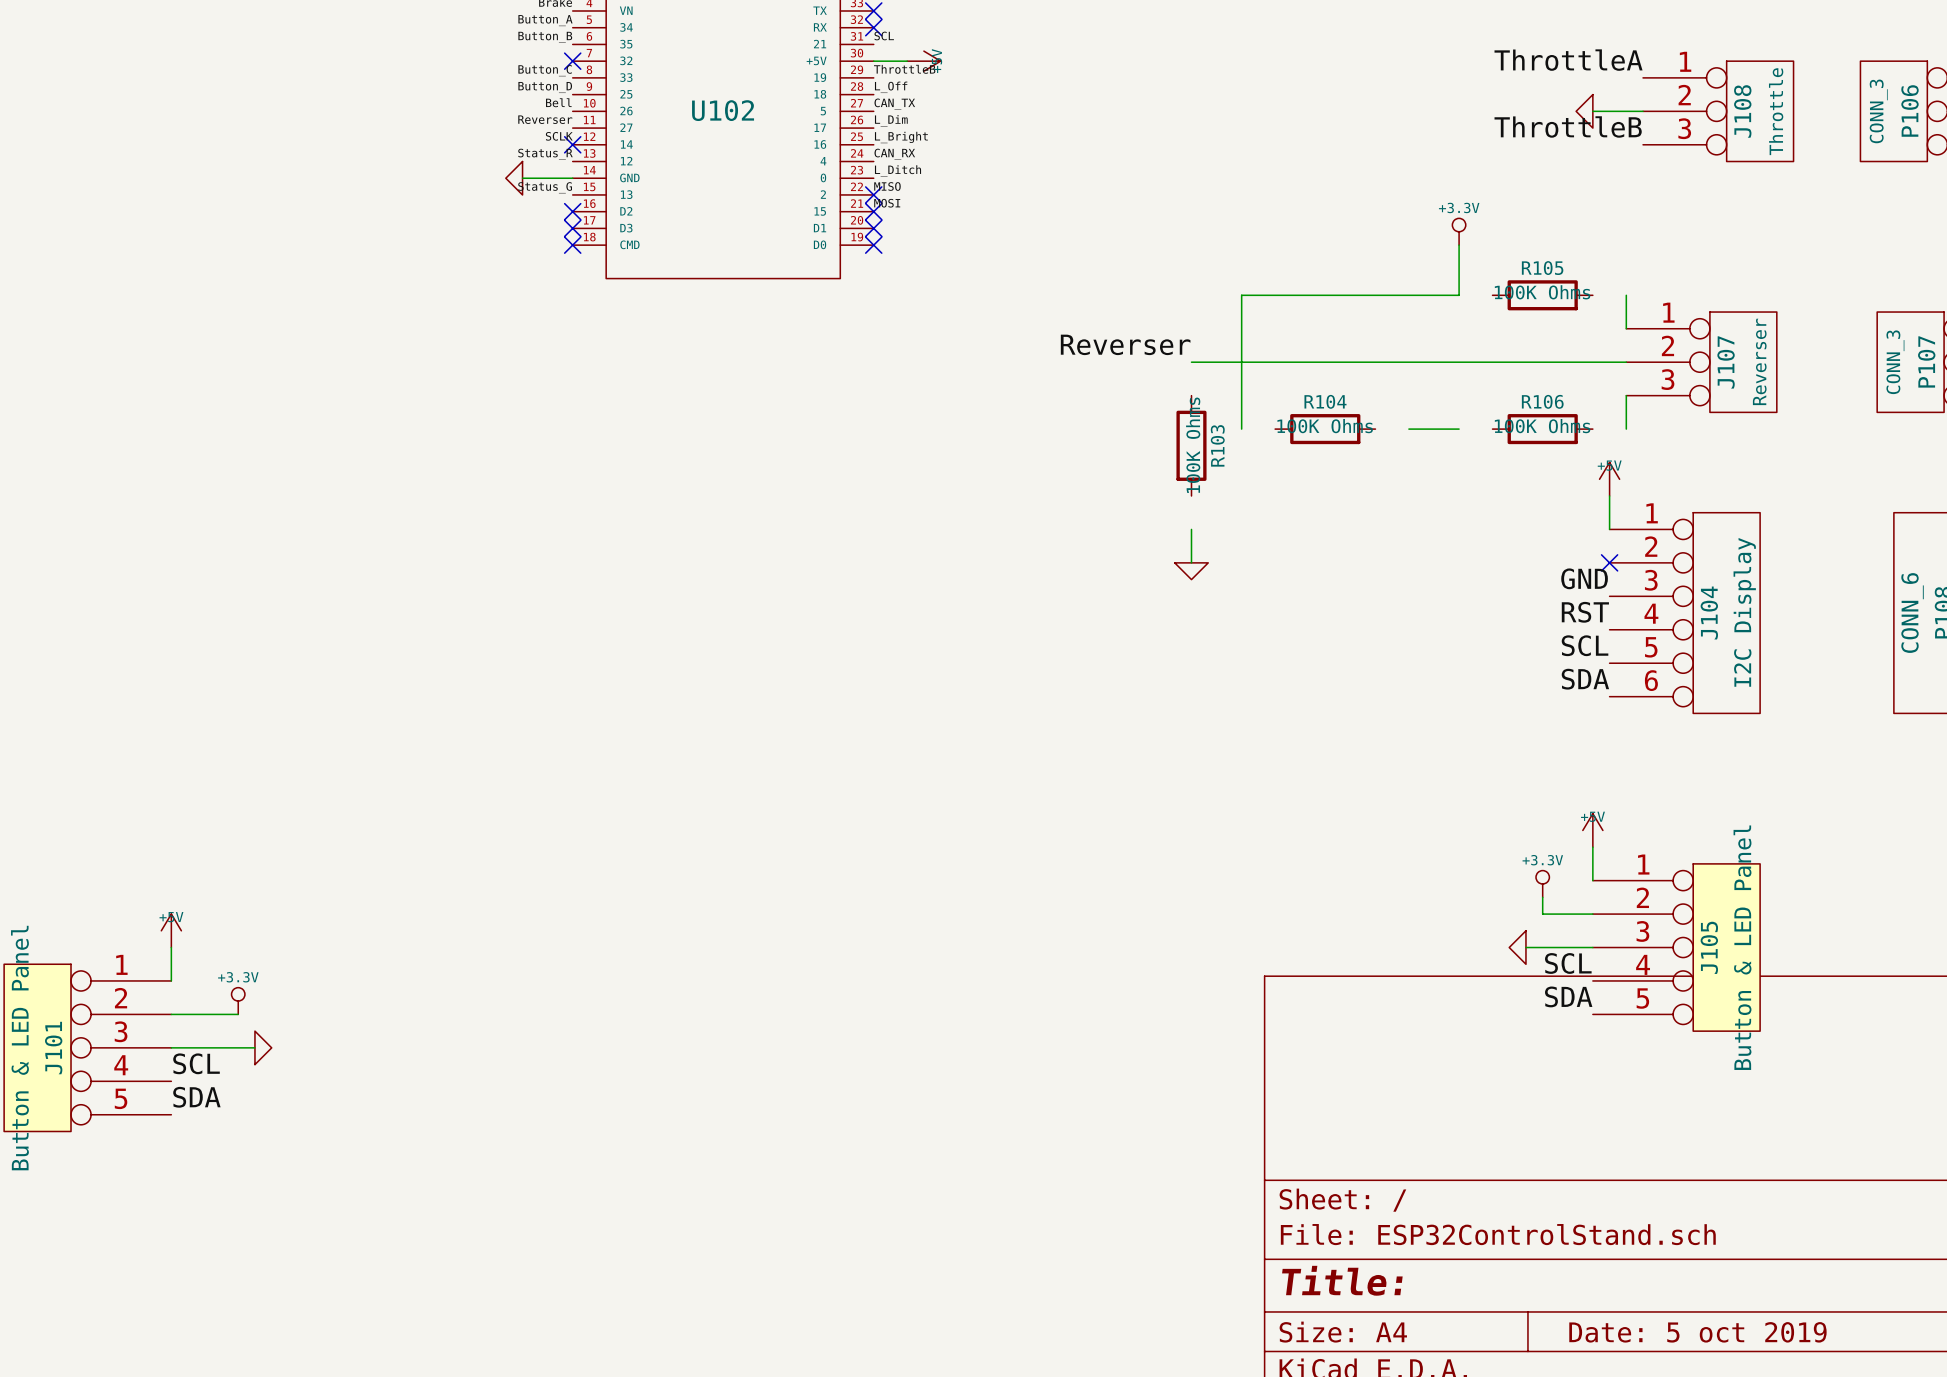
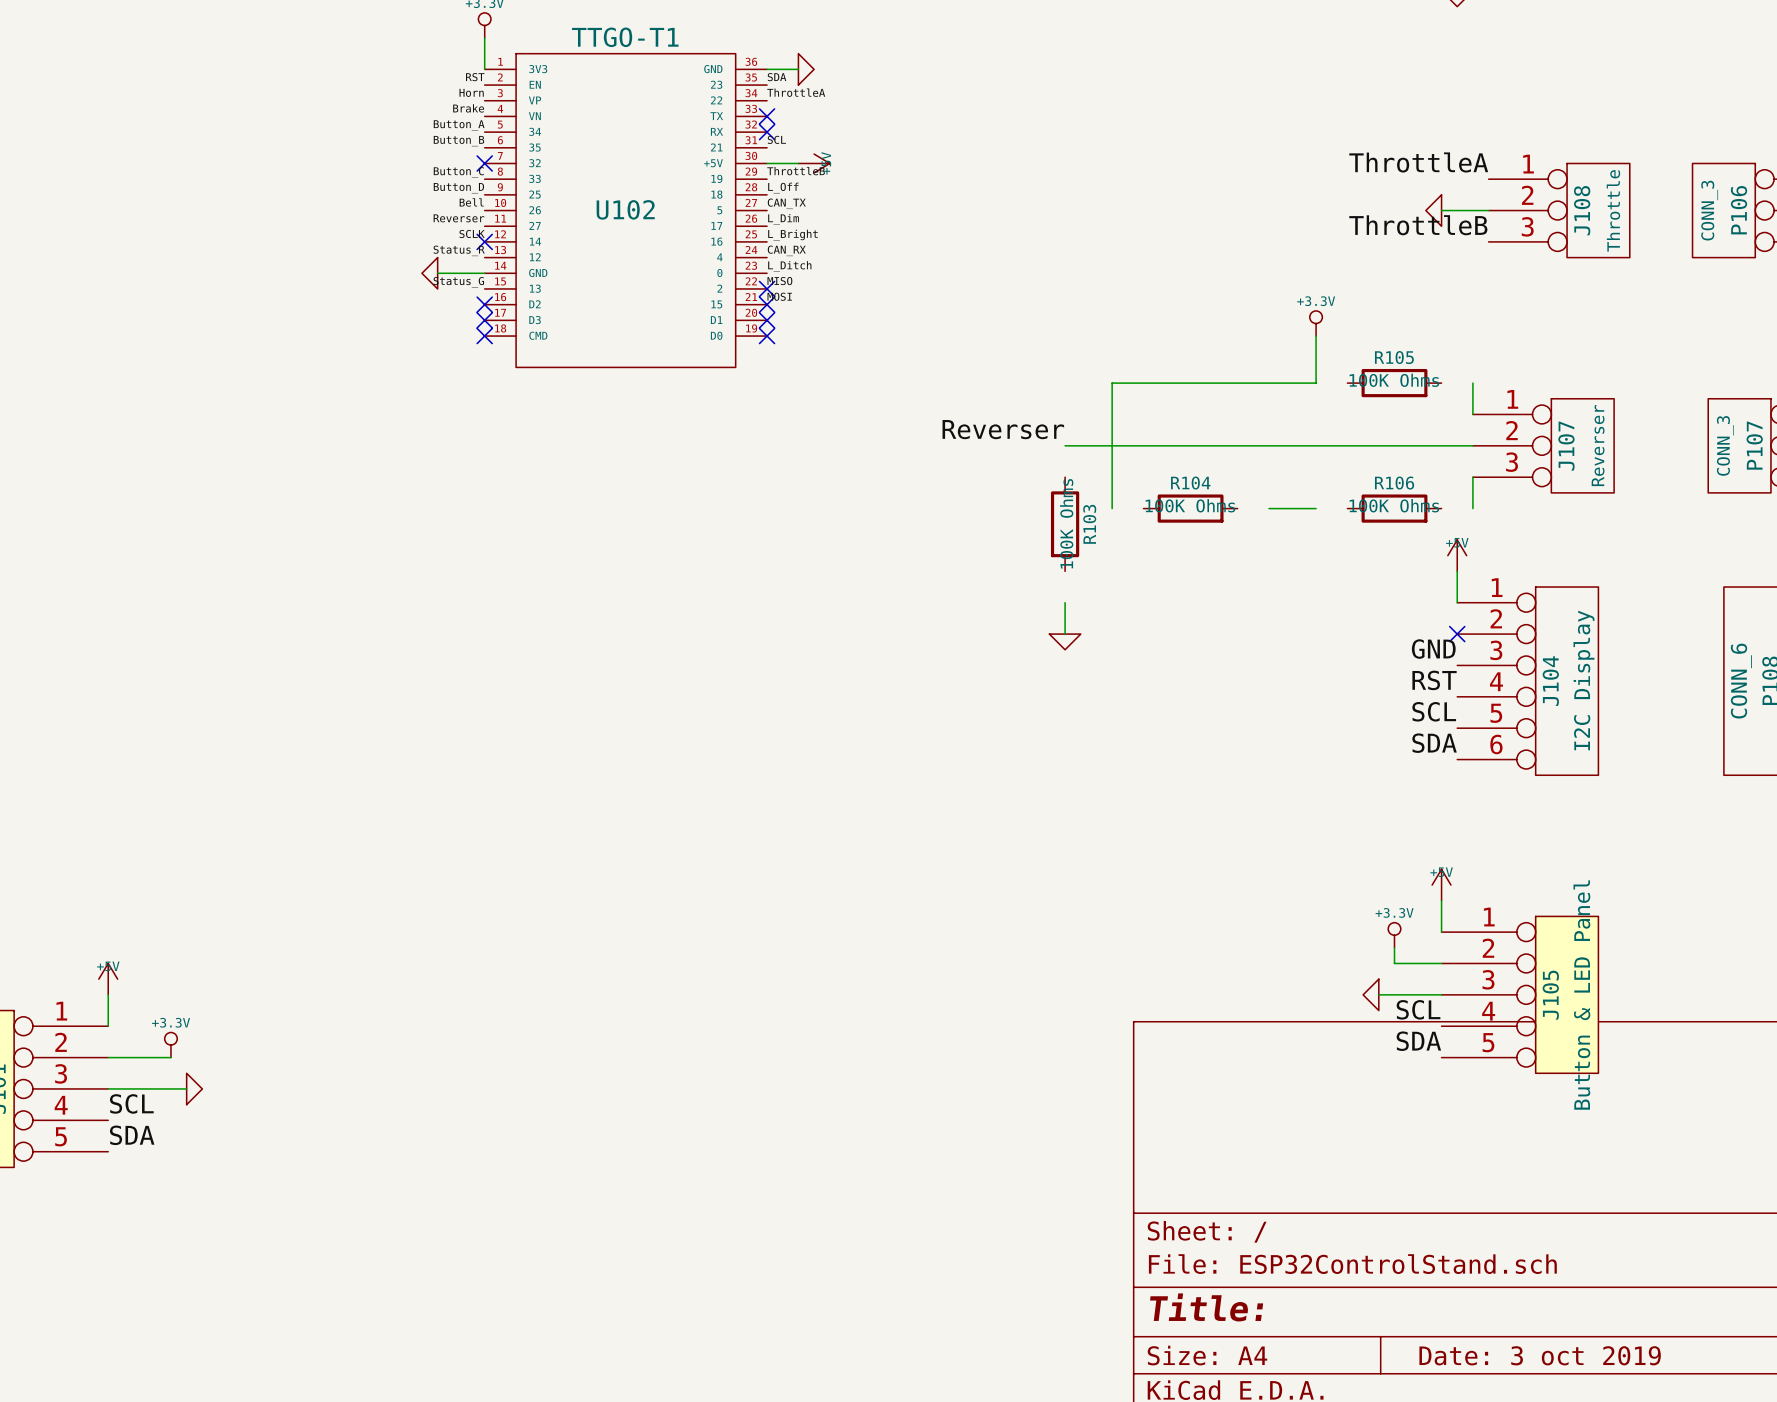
title block: Date: 5 oct 2019 (1697, 1332) -> Date: 3 oct 2019 (1540, 1355)

